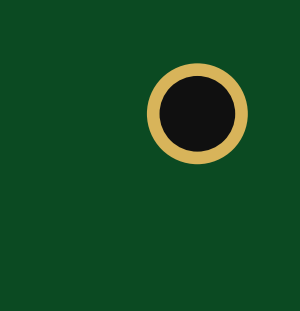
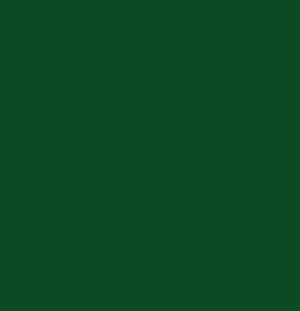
part: (197, 113) -> none

